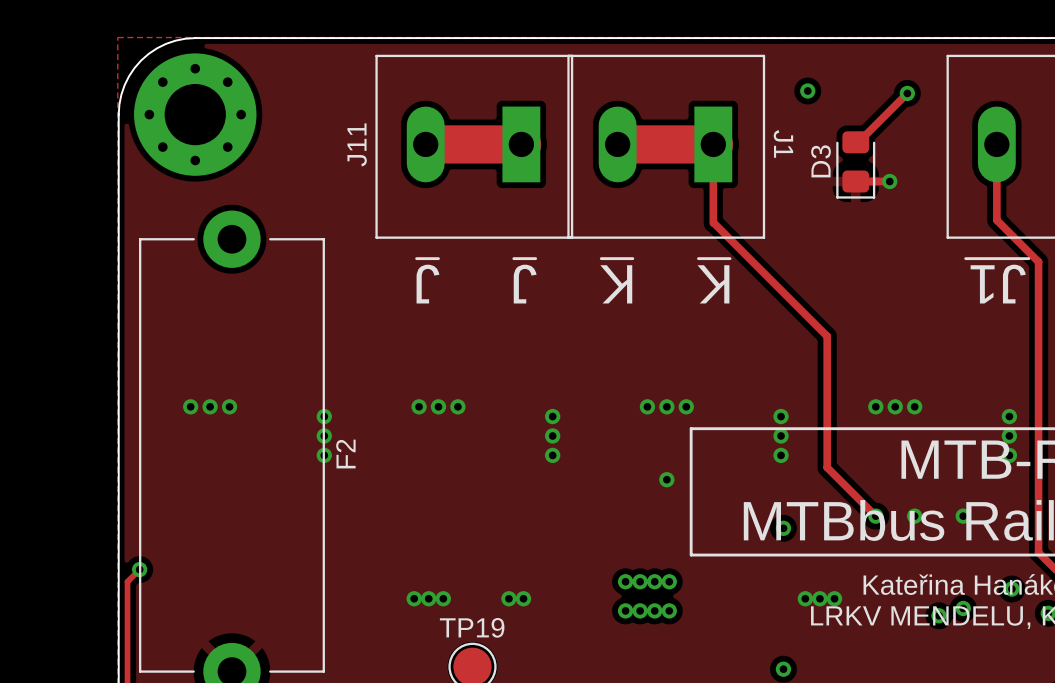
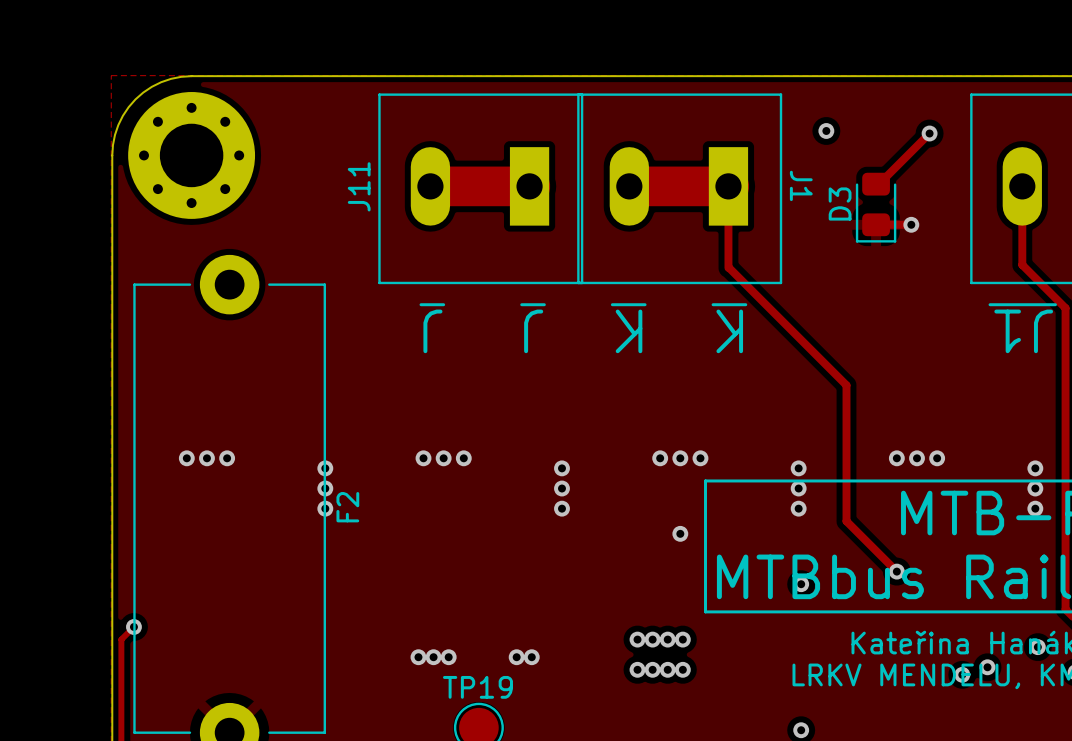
via: (914, 516) -> none
via: (963, 516) -> none
via: (805, 598) -> none
via: (819, 598) -> none
via: (834, 598) -> none

